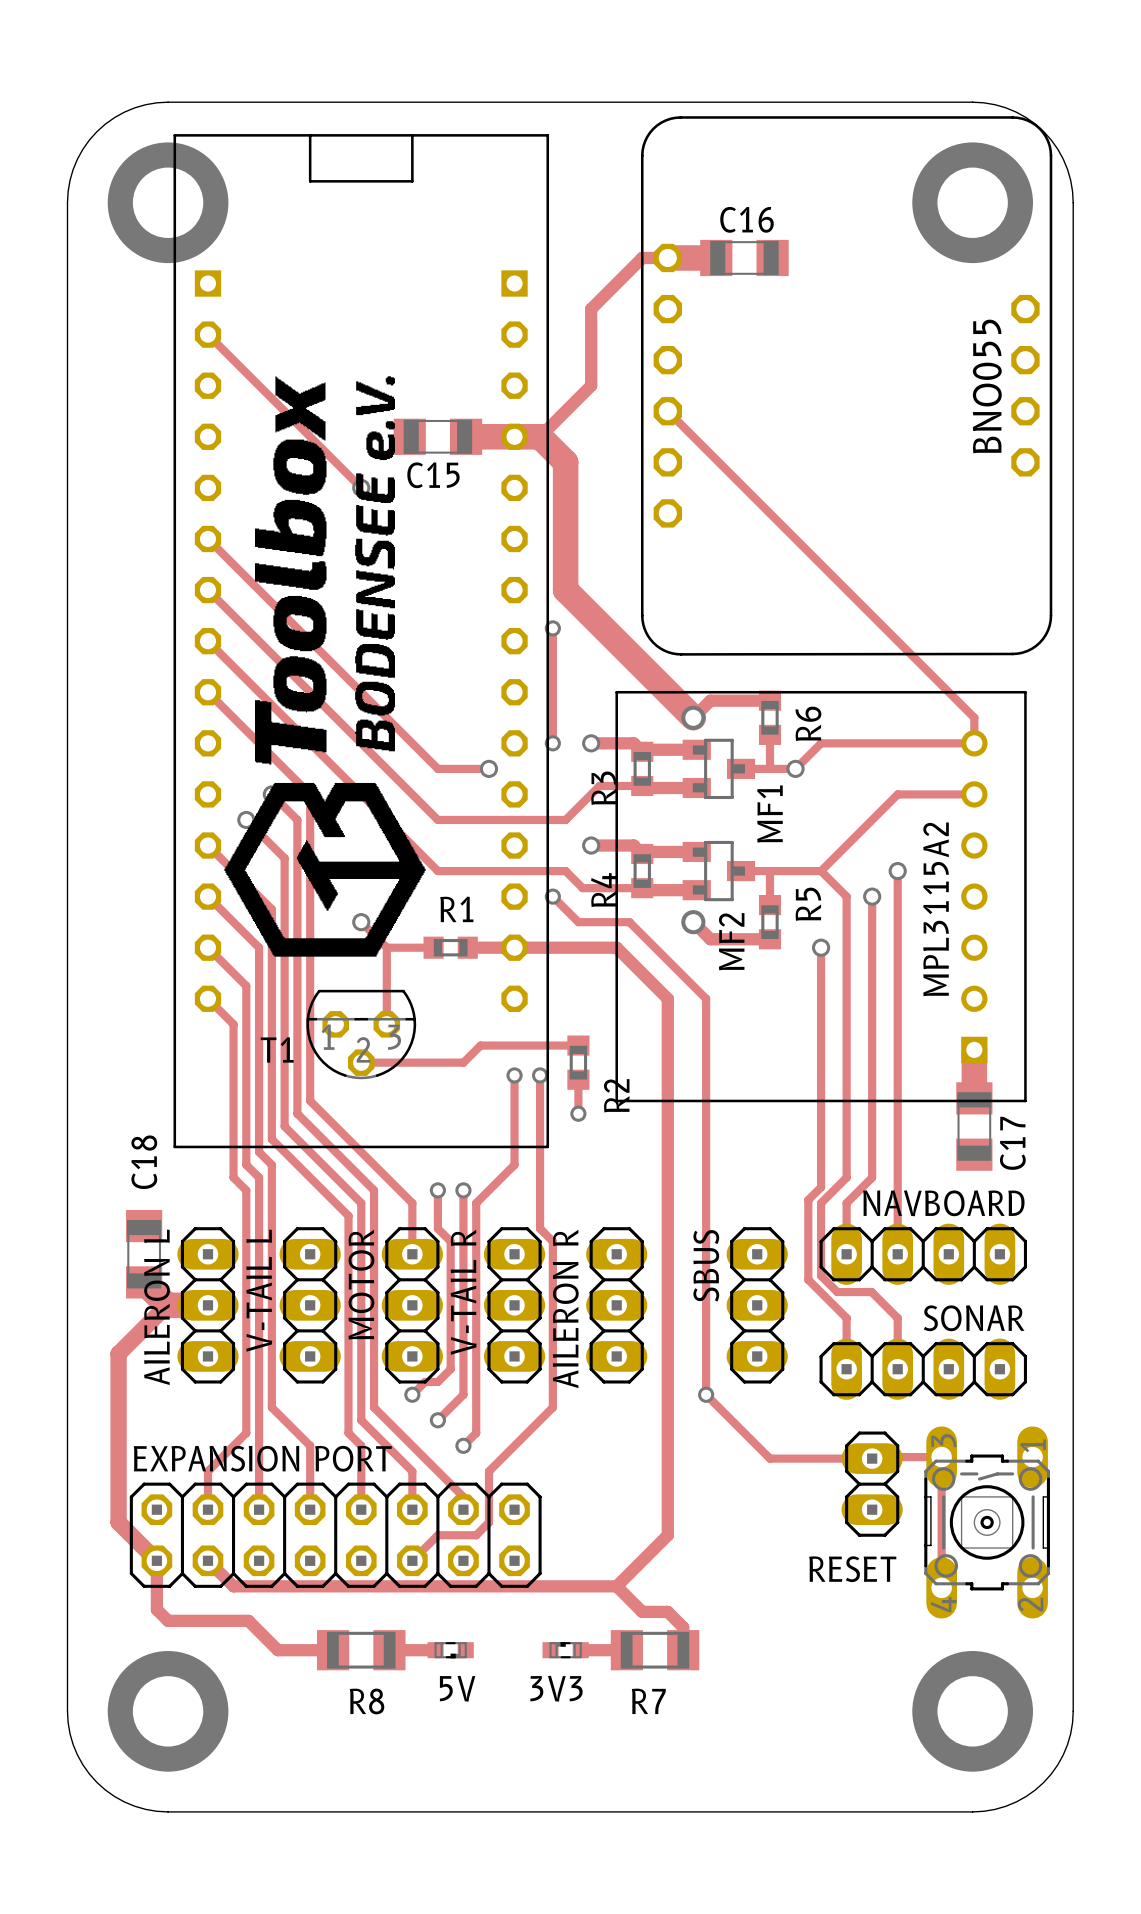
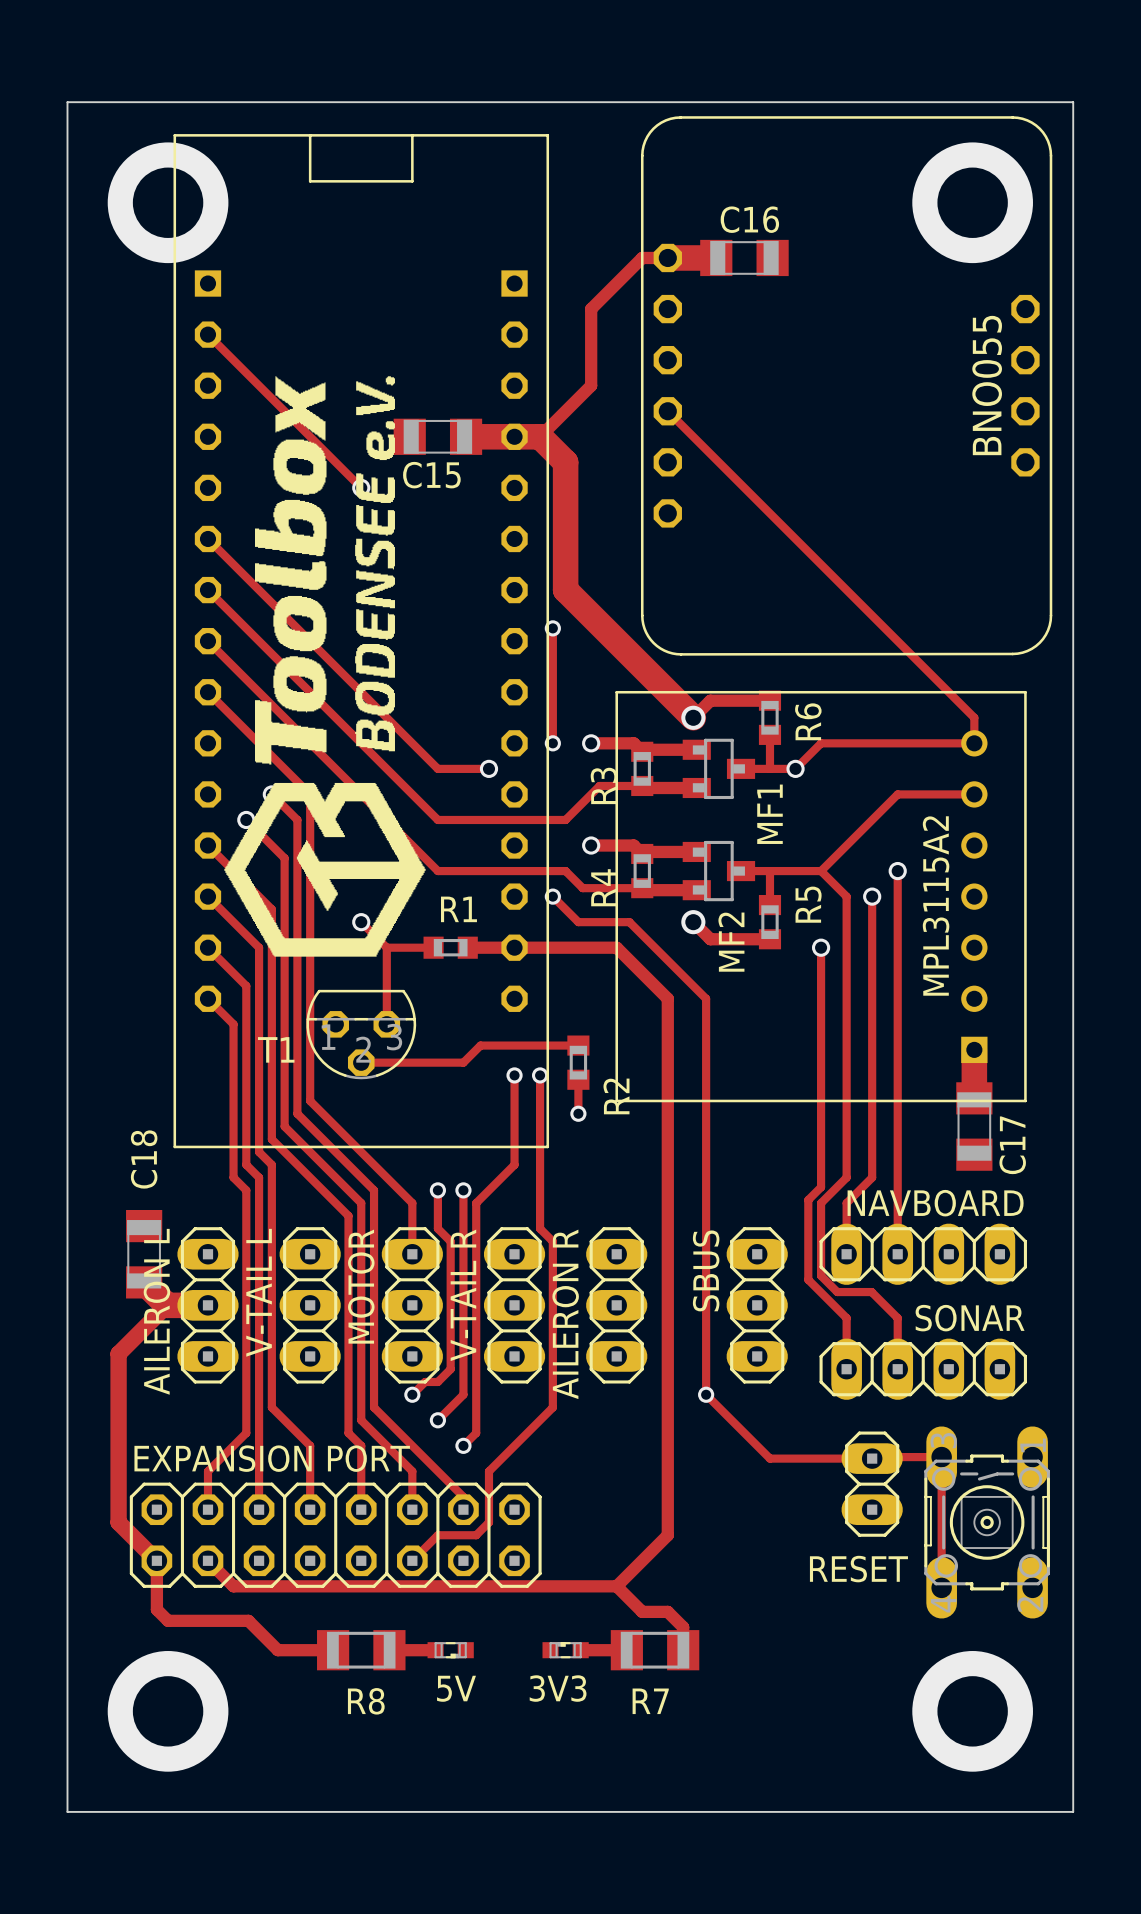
board edge: (168, 102) (134, 107) (114, 117) (96, 131) (82, 149) (73, 169) (67, 202) -> (168, 102) (67, 102) (67, 202)
board edge: (972, 102) (1005, 107) (1026, 117) (1043, 131) (1057, 149) (1067, 169) (1073, 202) -> (972, 102) (1073, 102) (1073, 202)
board edge: (67, 1711) (73, 1744) (82, 1764) (96, 1782) (114, 1796) (134, 1806) (168, 1811) -> (67, 1711) (67, 1811) (168, 1811)
board edge: (1073, 1711) (1067, 1744) (1057, 1764) (1043, 1782) (1026, 1796) (1005, 1806) (972, 1811) -> (1073, 1711) (1073, 1811) (972, 1811)

